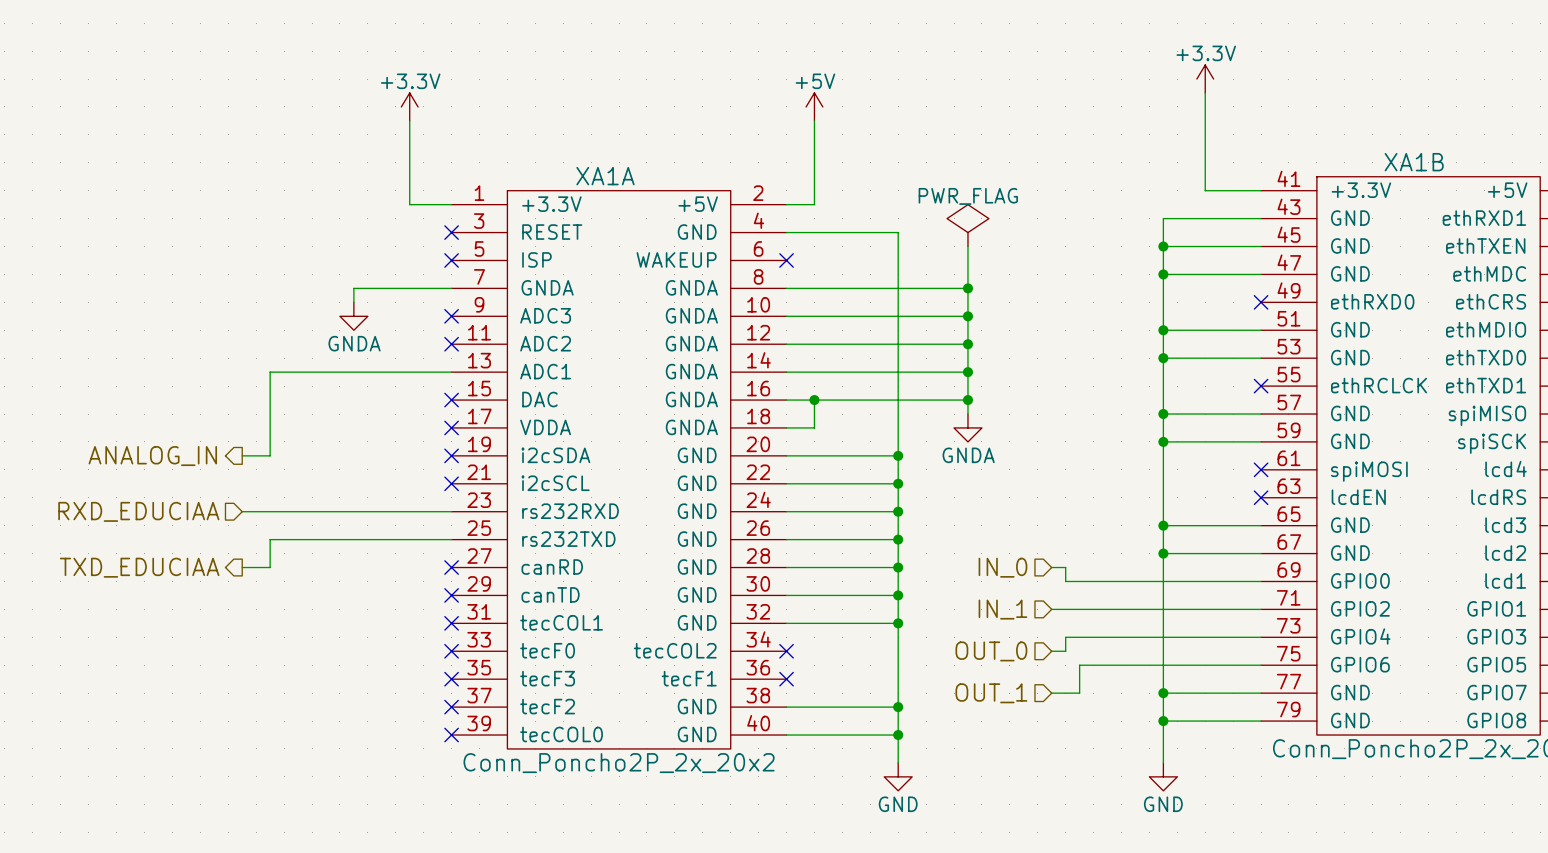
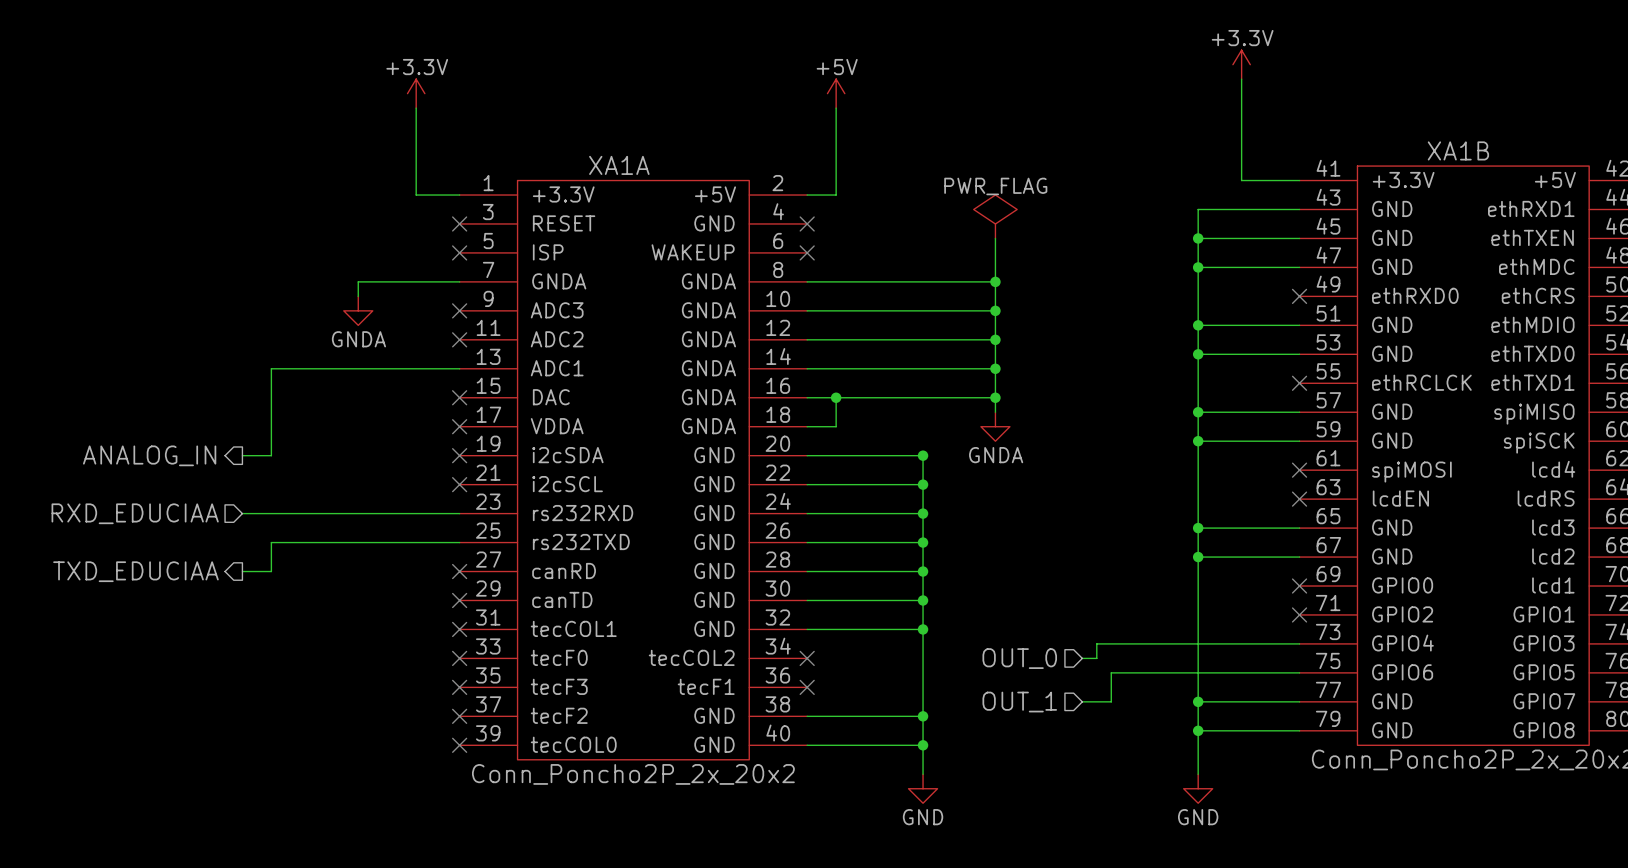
wire: (786, 232) (898, 232) (898, 455) -> none
no-connect mark: none -> (807, 223)
hierarchical label: IN_0 (1002, 567) -> none
wire: (1051, 567) (1065, 567) (1065, 581) (1261, 581) -> none
no-connect mark: none -> (1299, 586)
hierarchical label: IN_1 (1002, 609) -> none
wire: (1051, 609) (1261, 609) -> none
no-connect mark: none -> (1299, 614)

